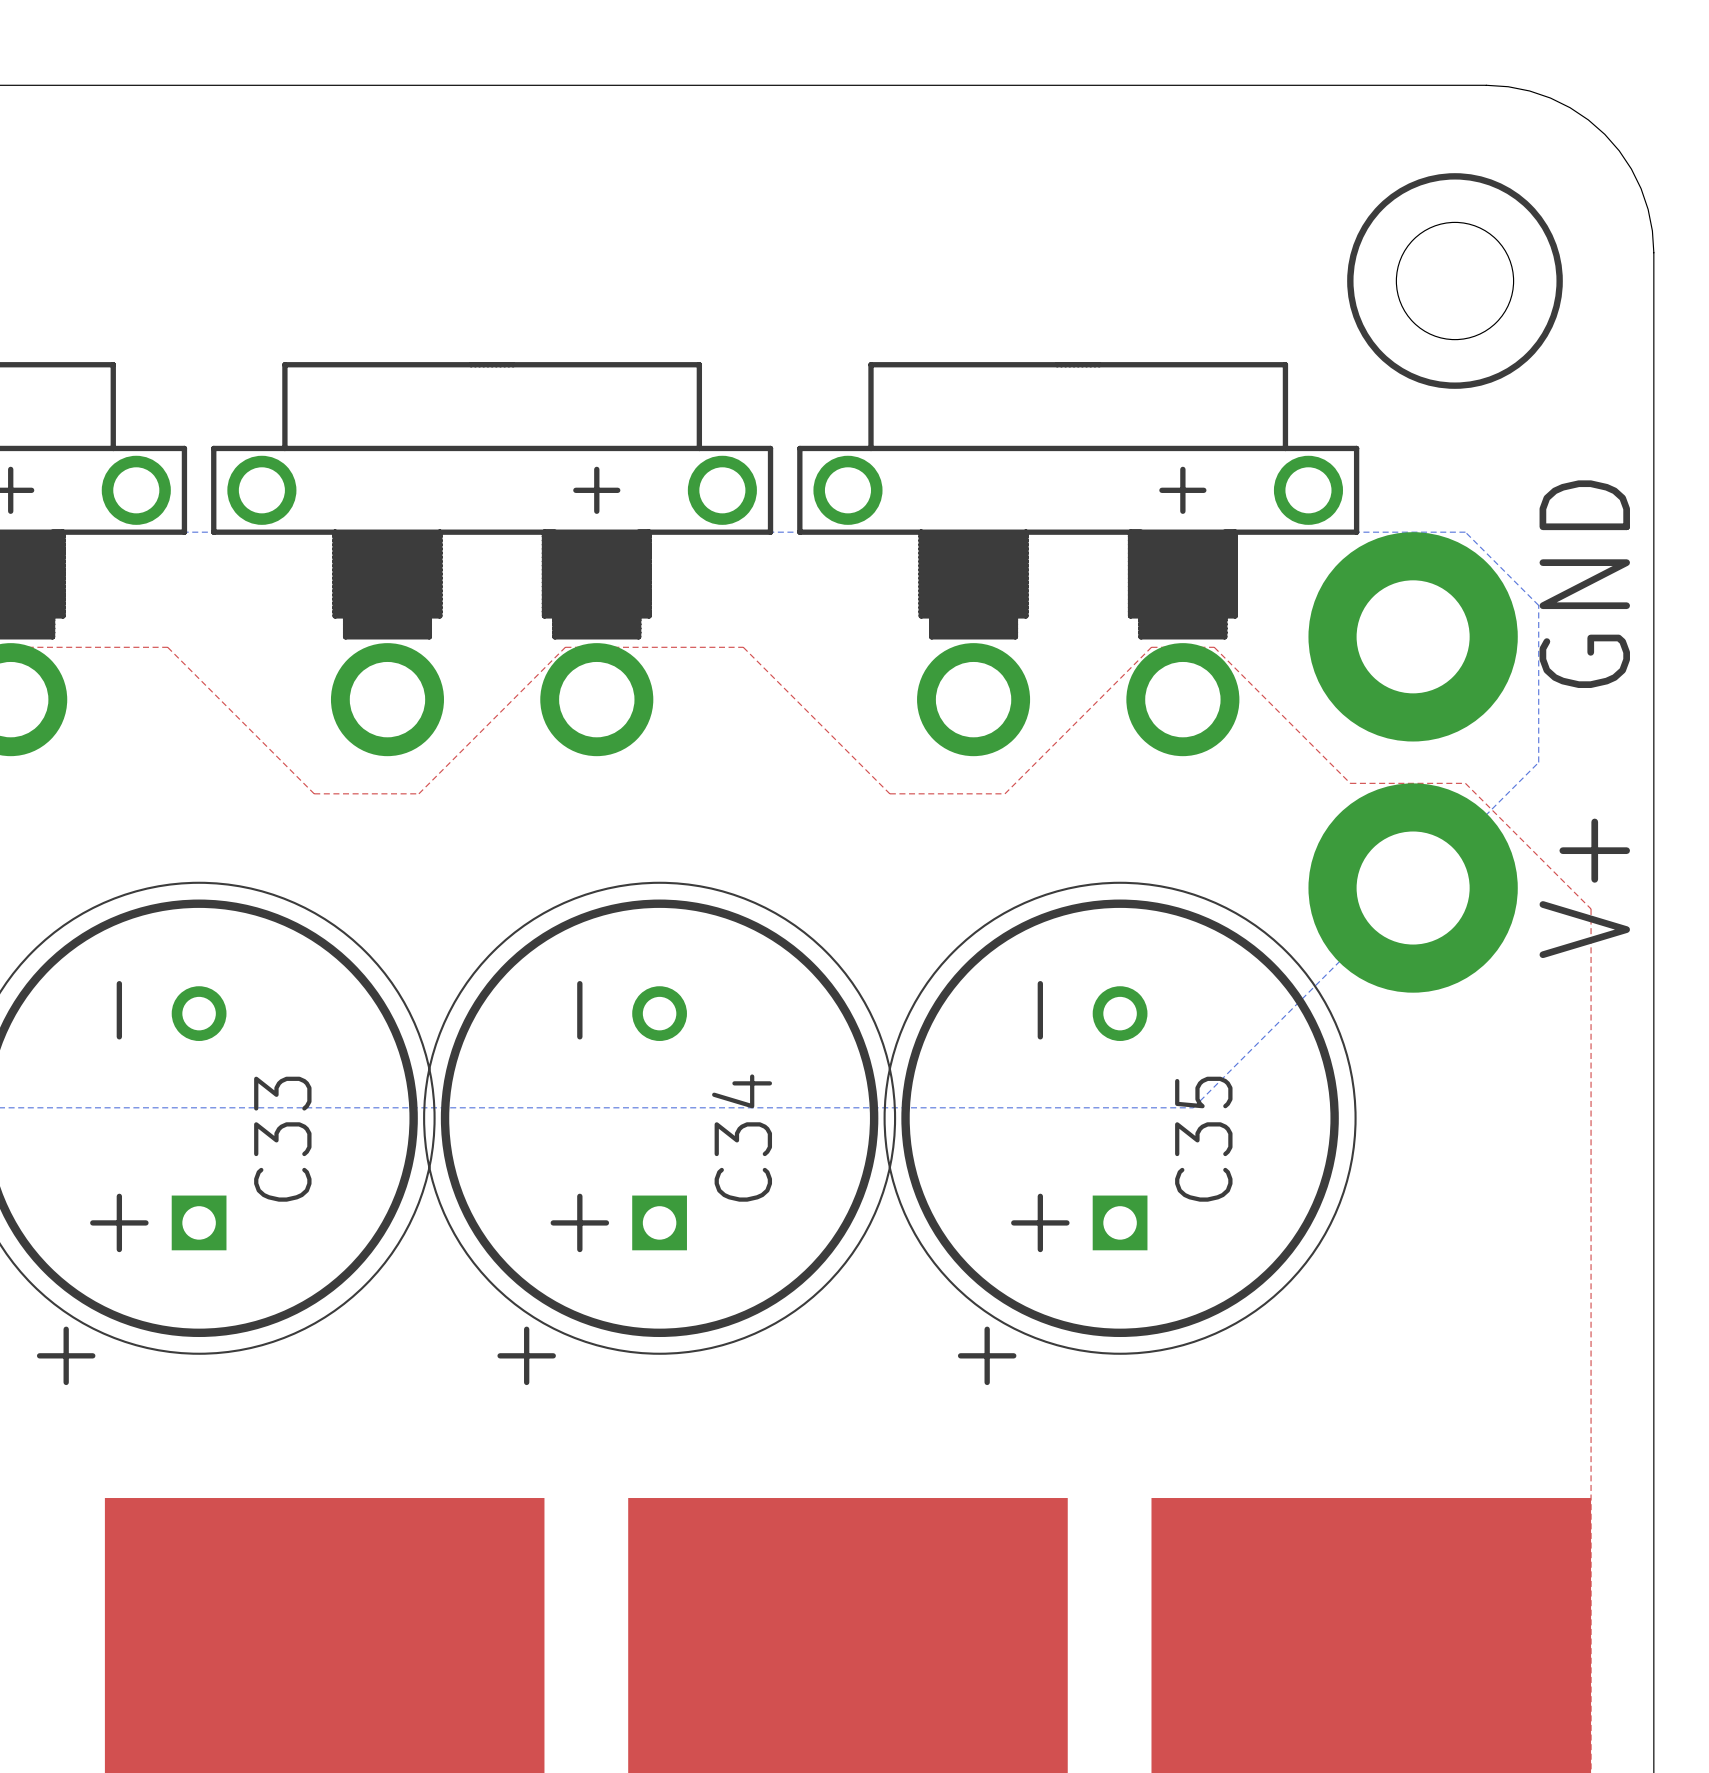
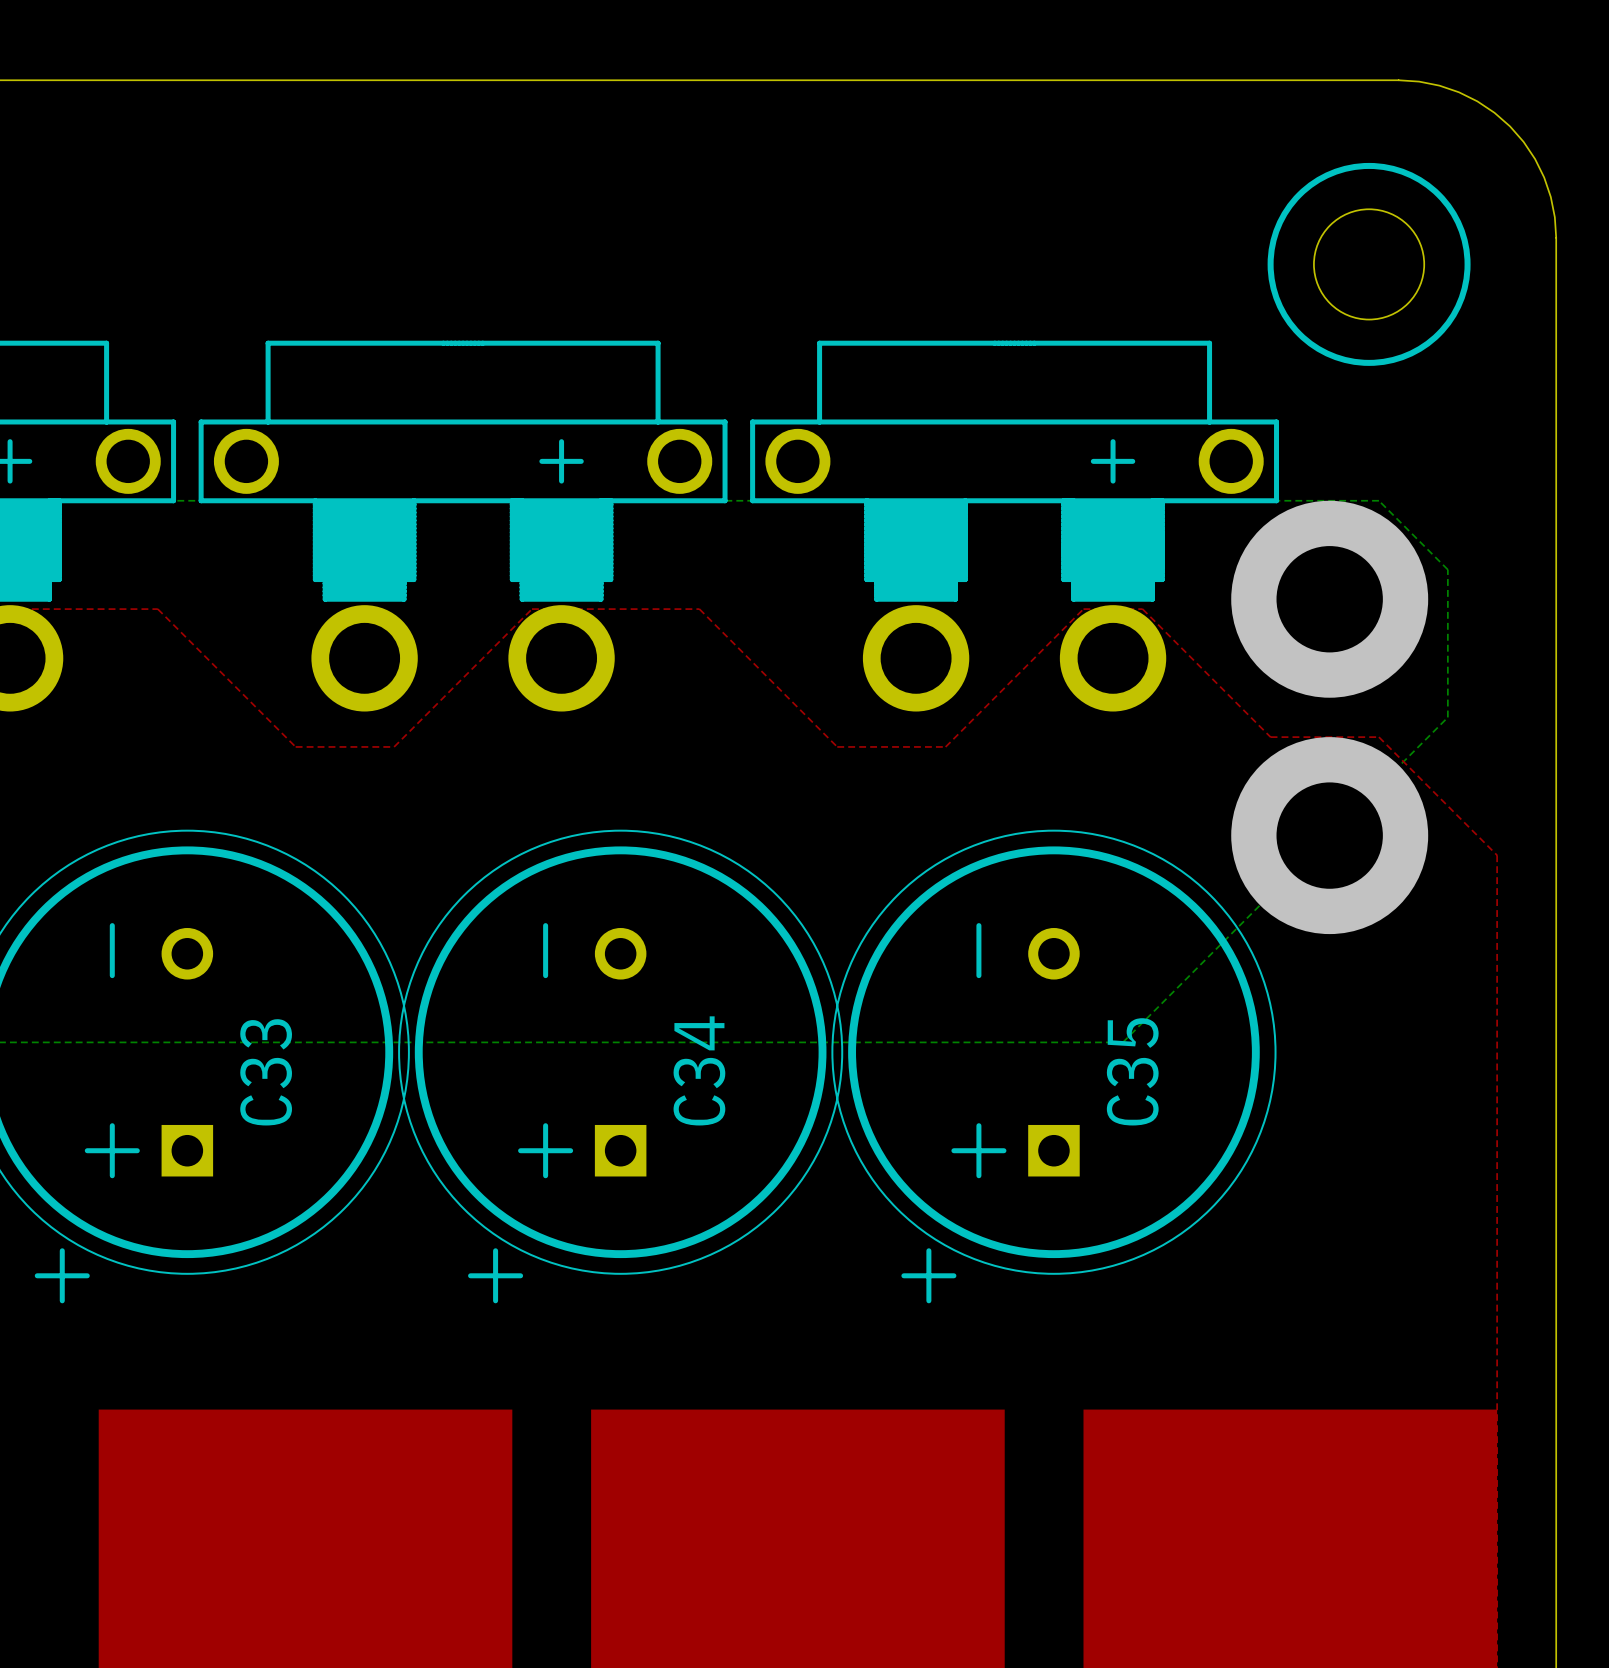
text: GND (1584, 584) -> none
text: V+ (1584, 888) -> none

